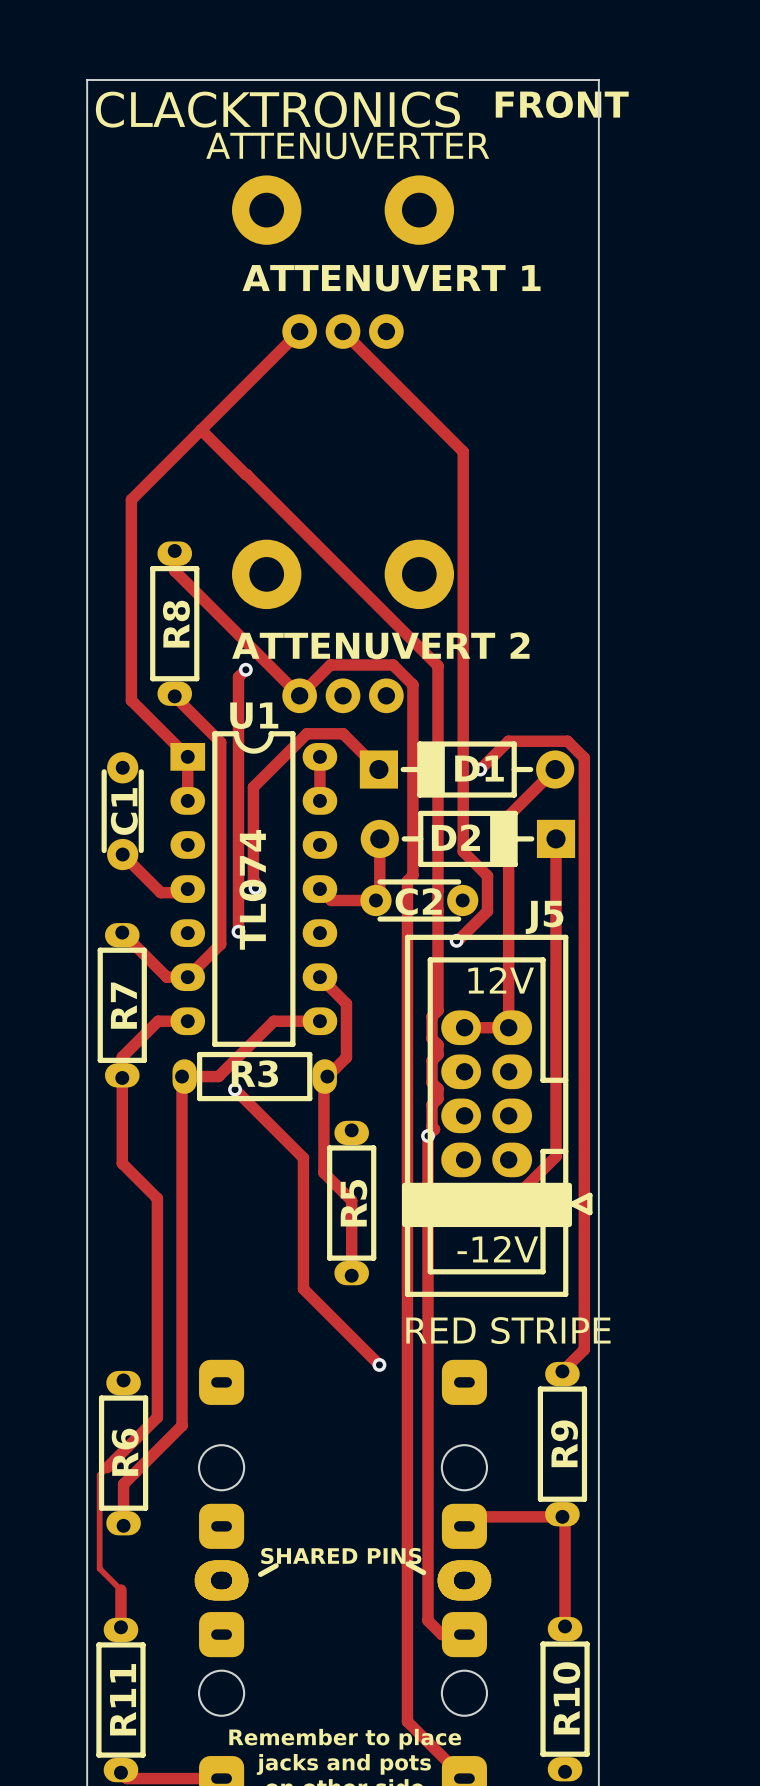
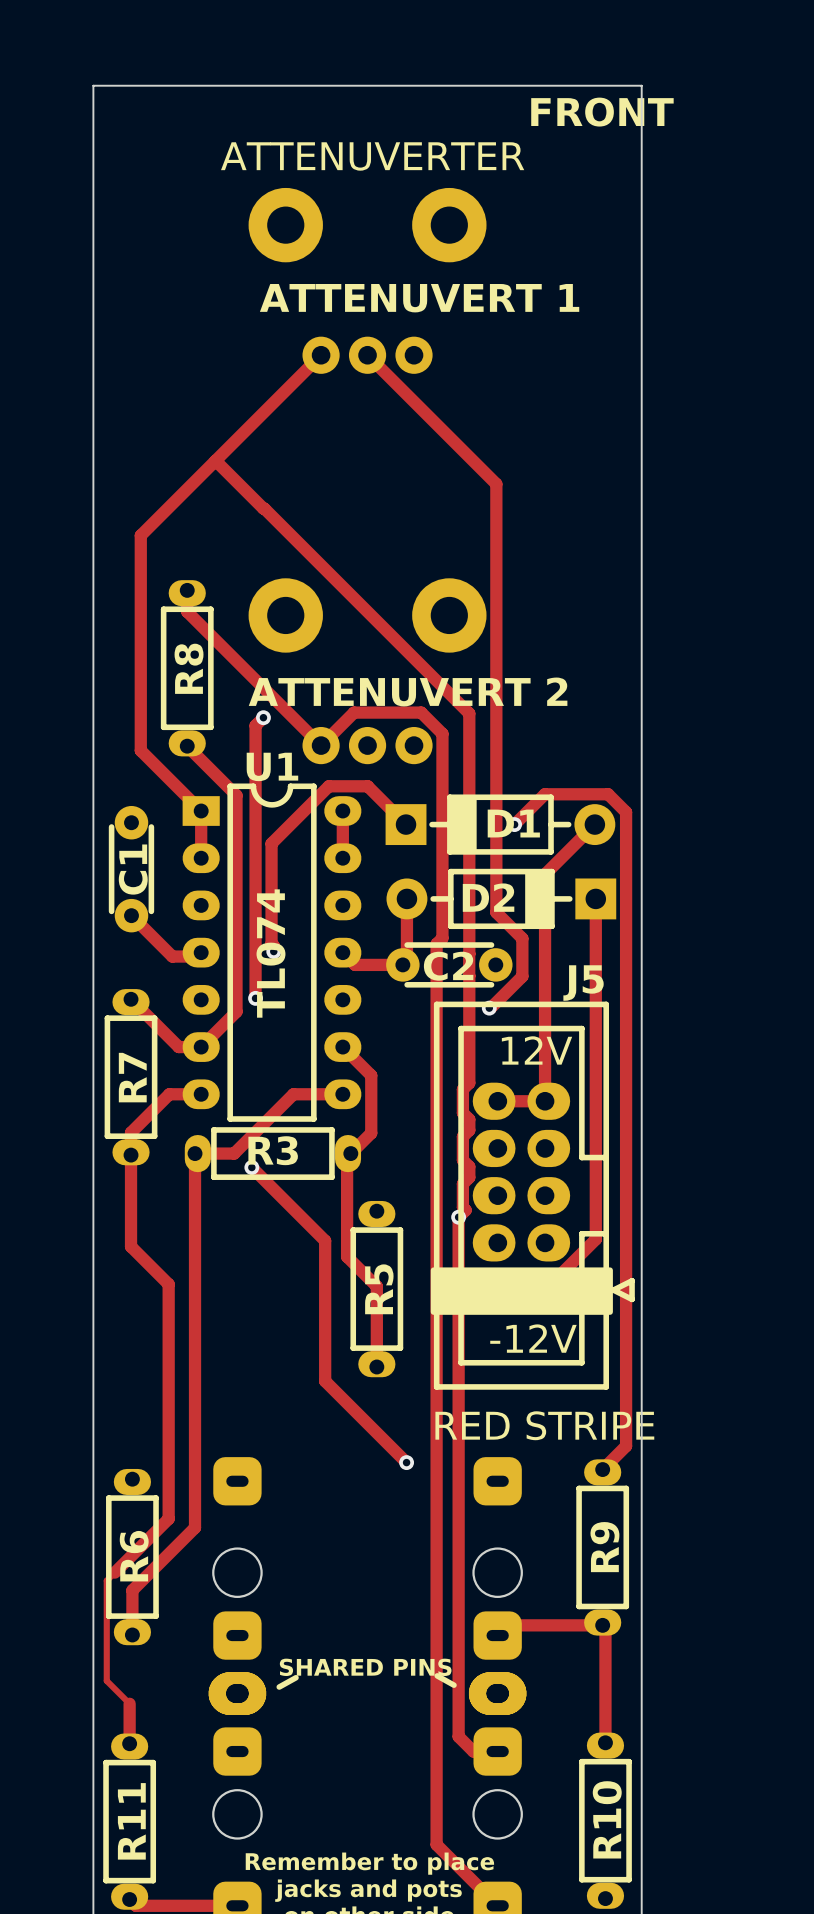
text: CLACKTRONICS (277, 109) -> none

